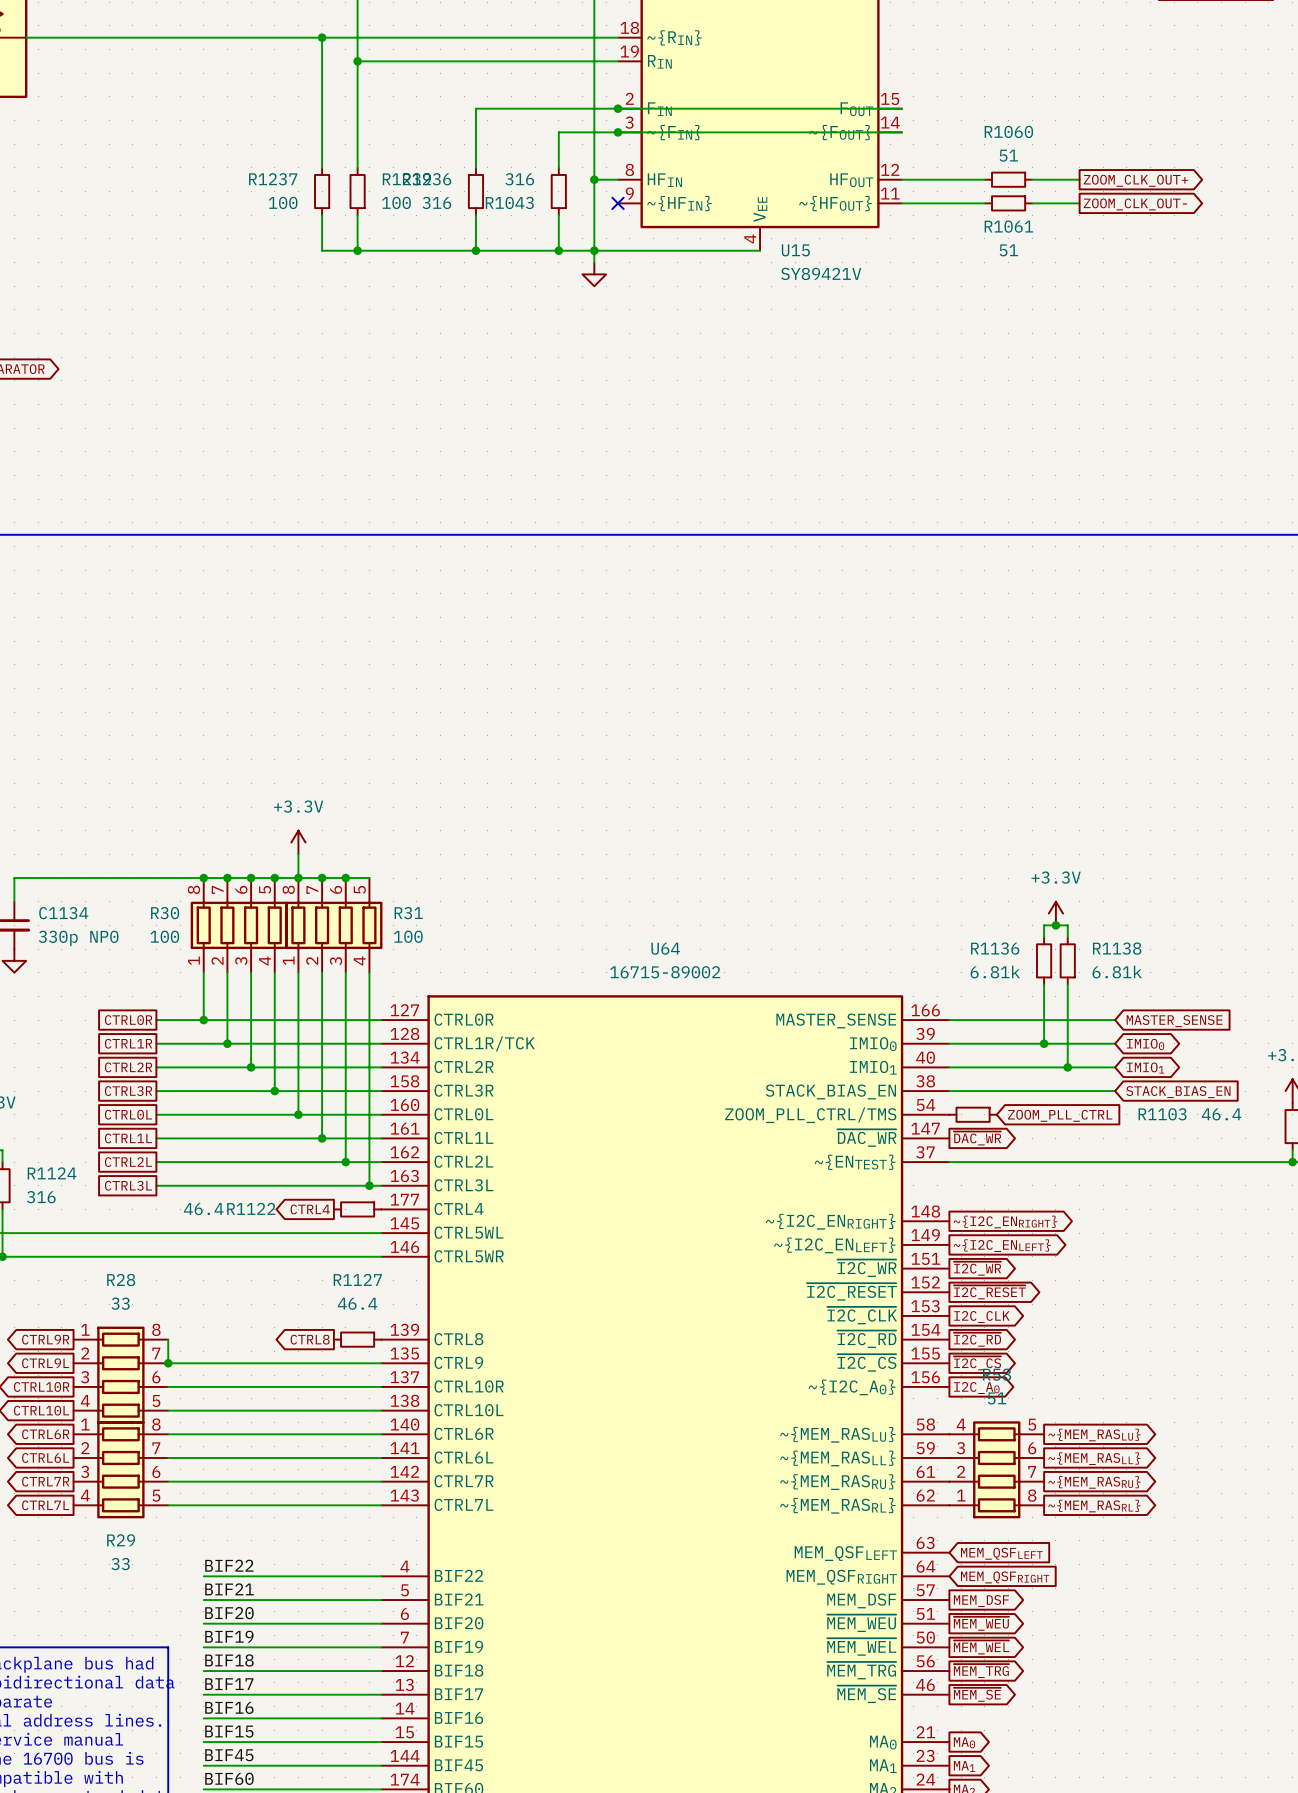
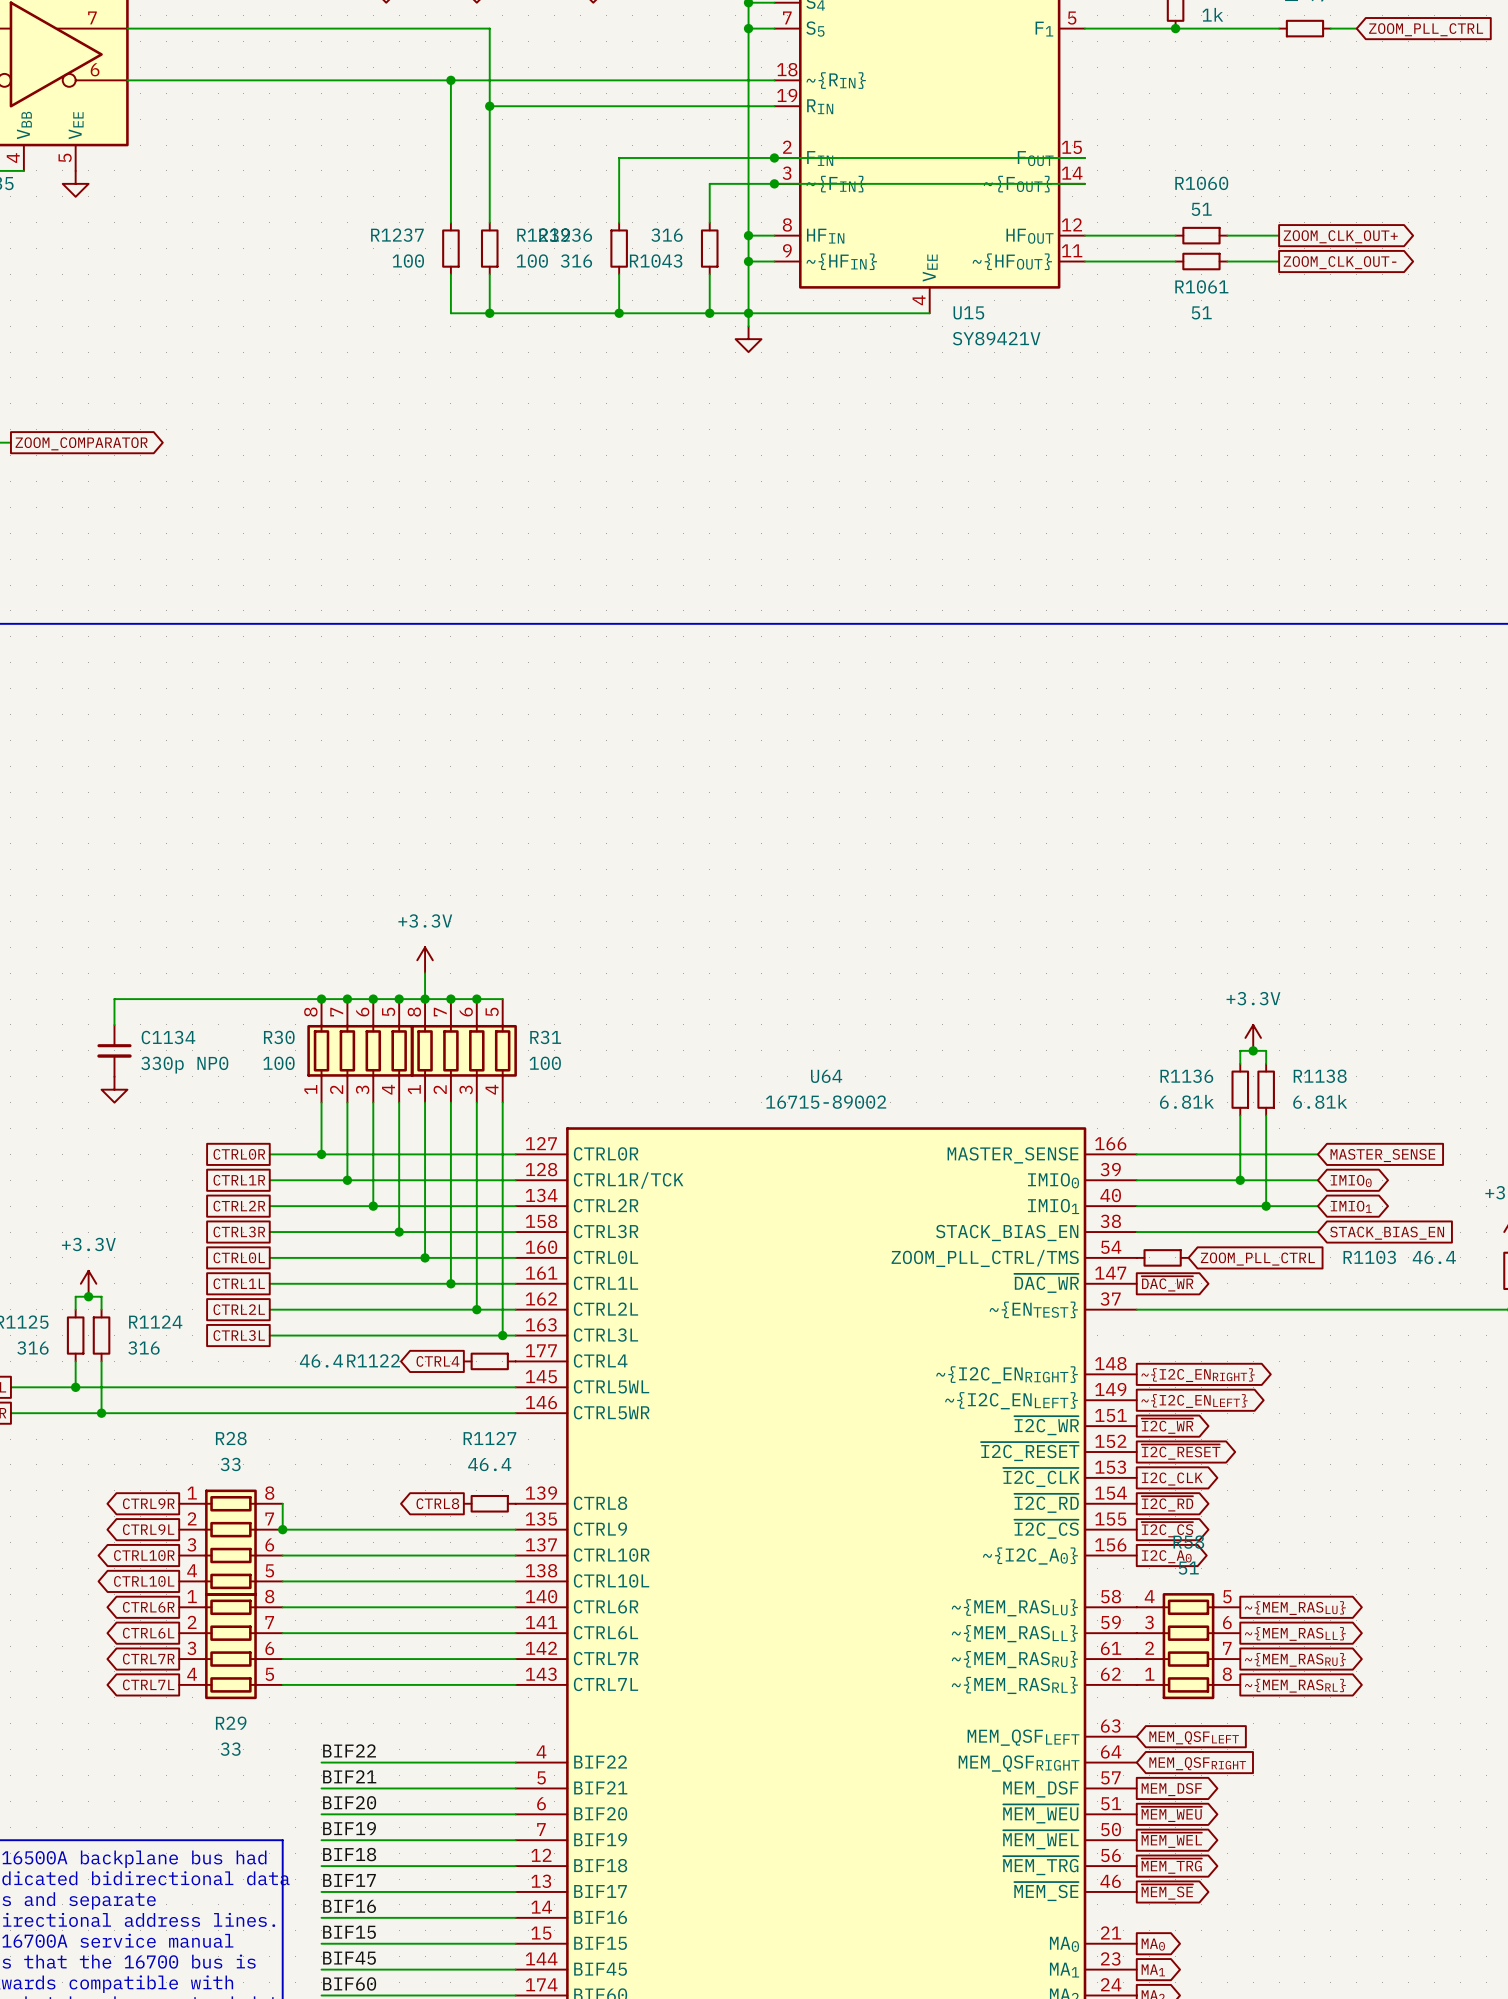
wire: none -> (748, 261) (774, 261)
junction: none -> (748, 261)
no-connect mark: (617, 203) -> none

